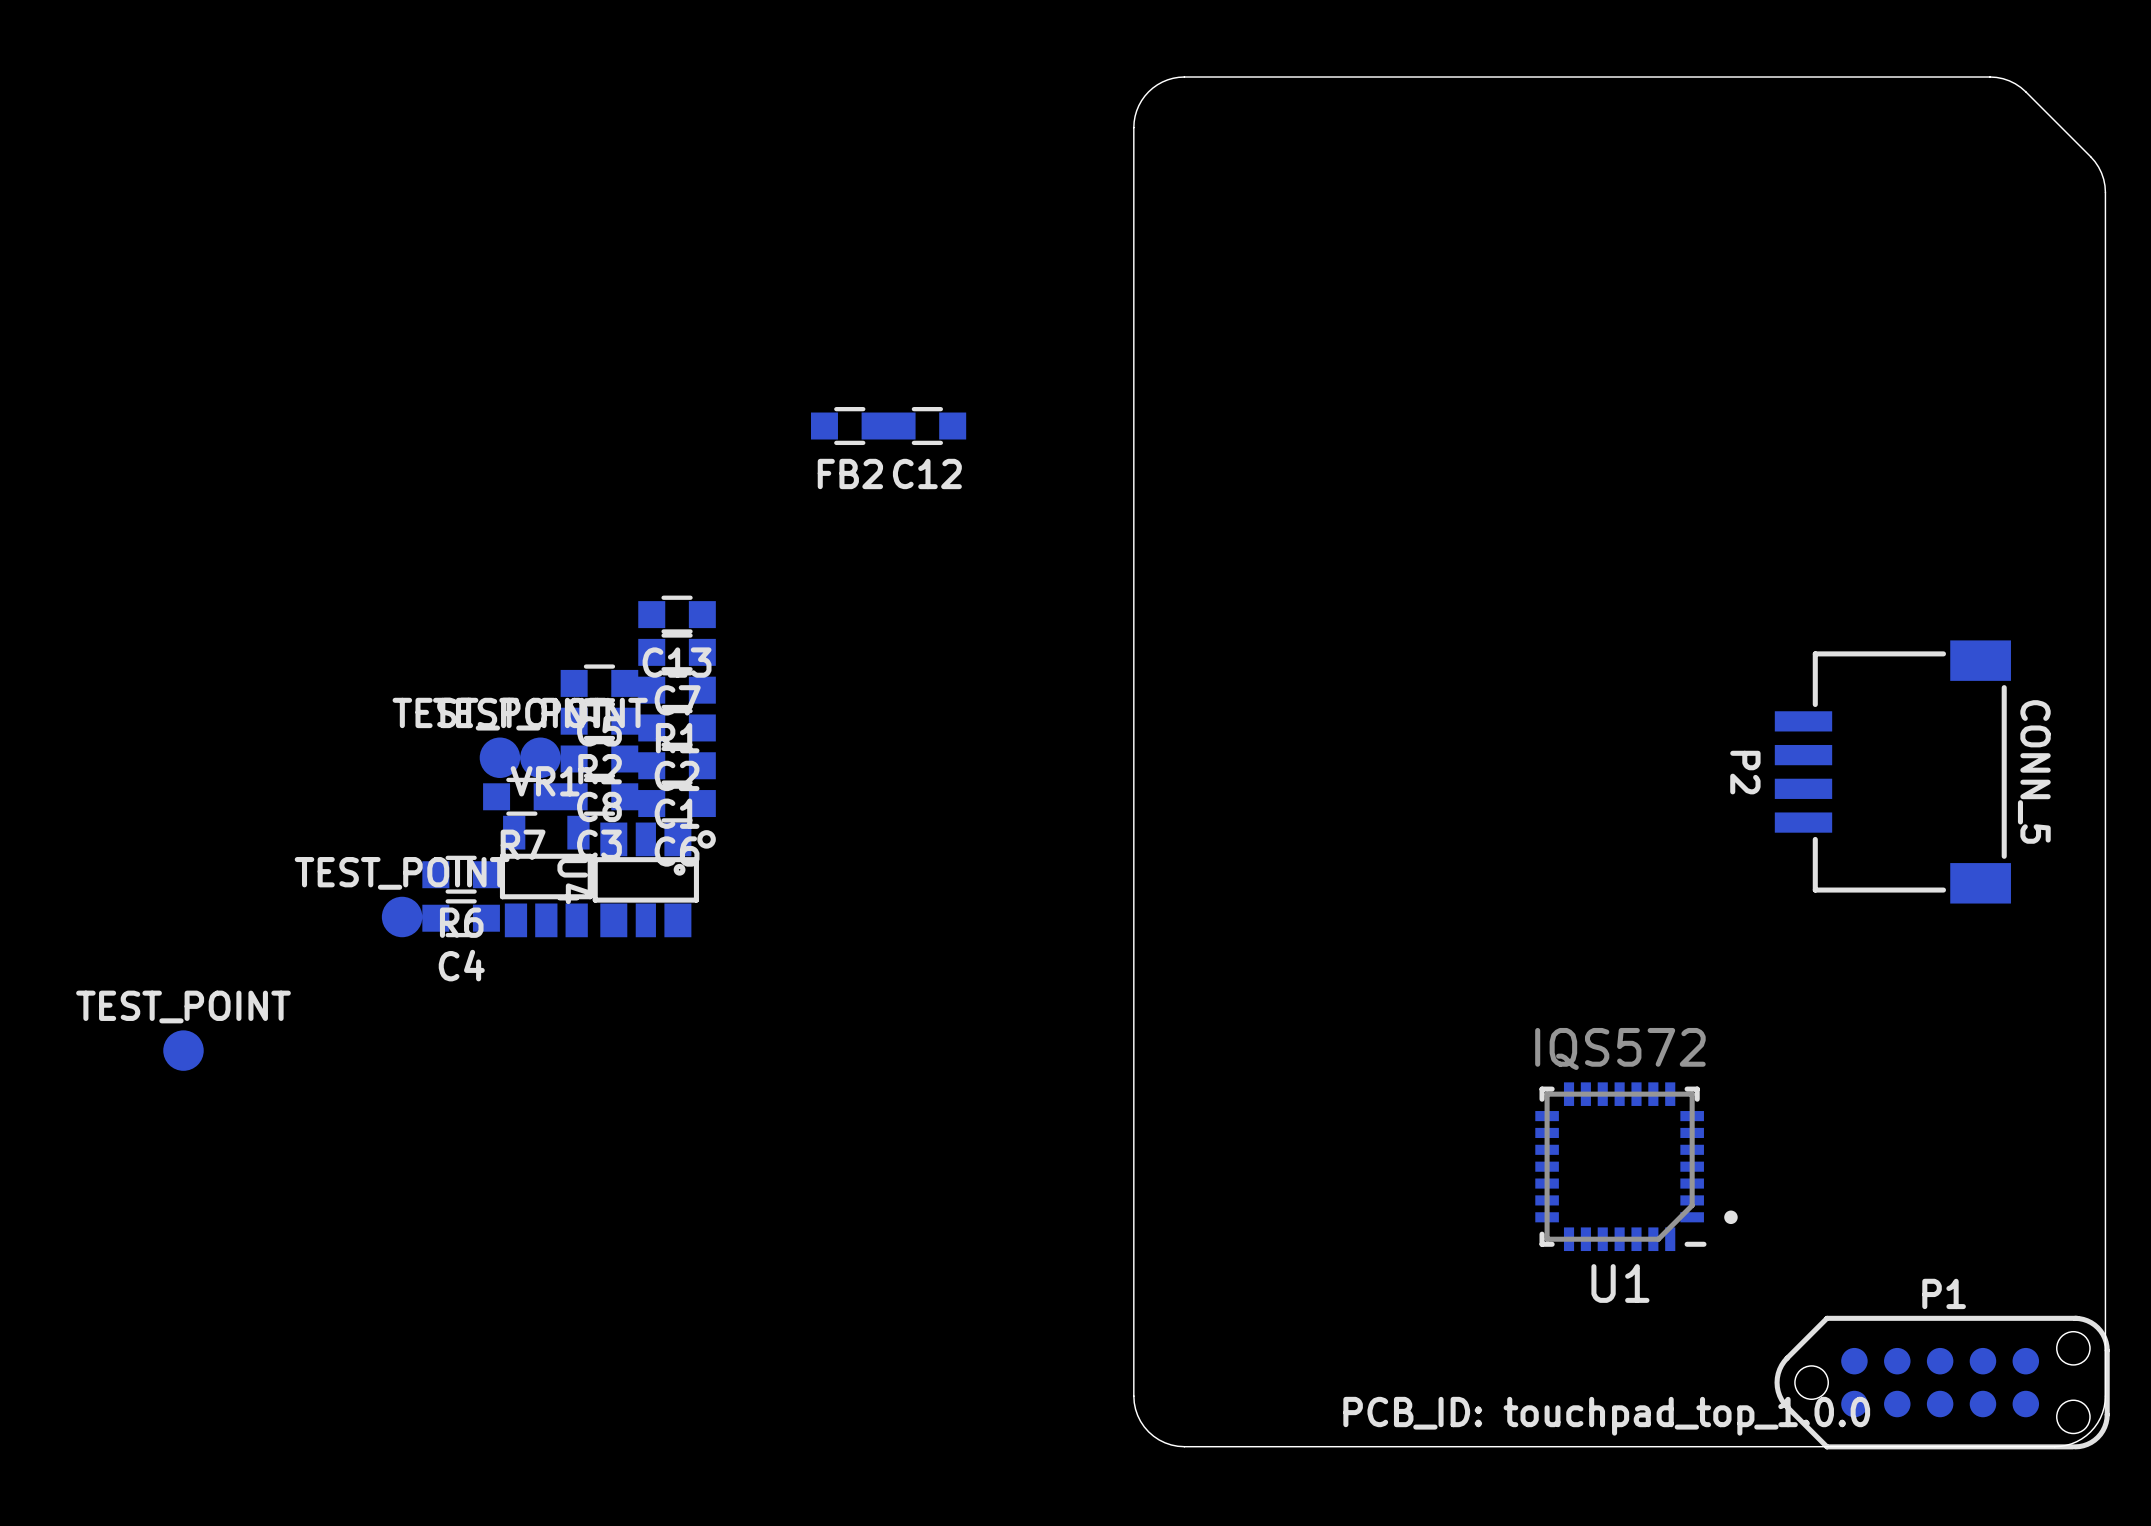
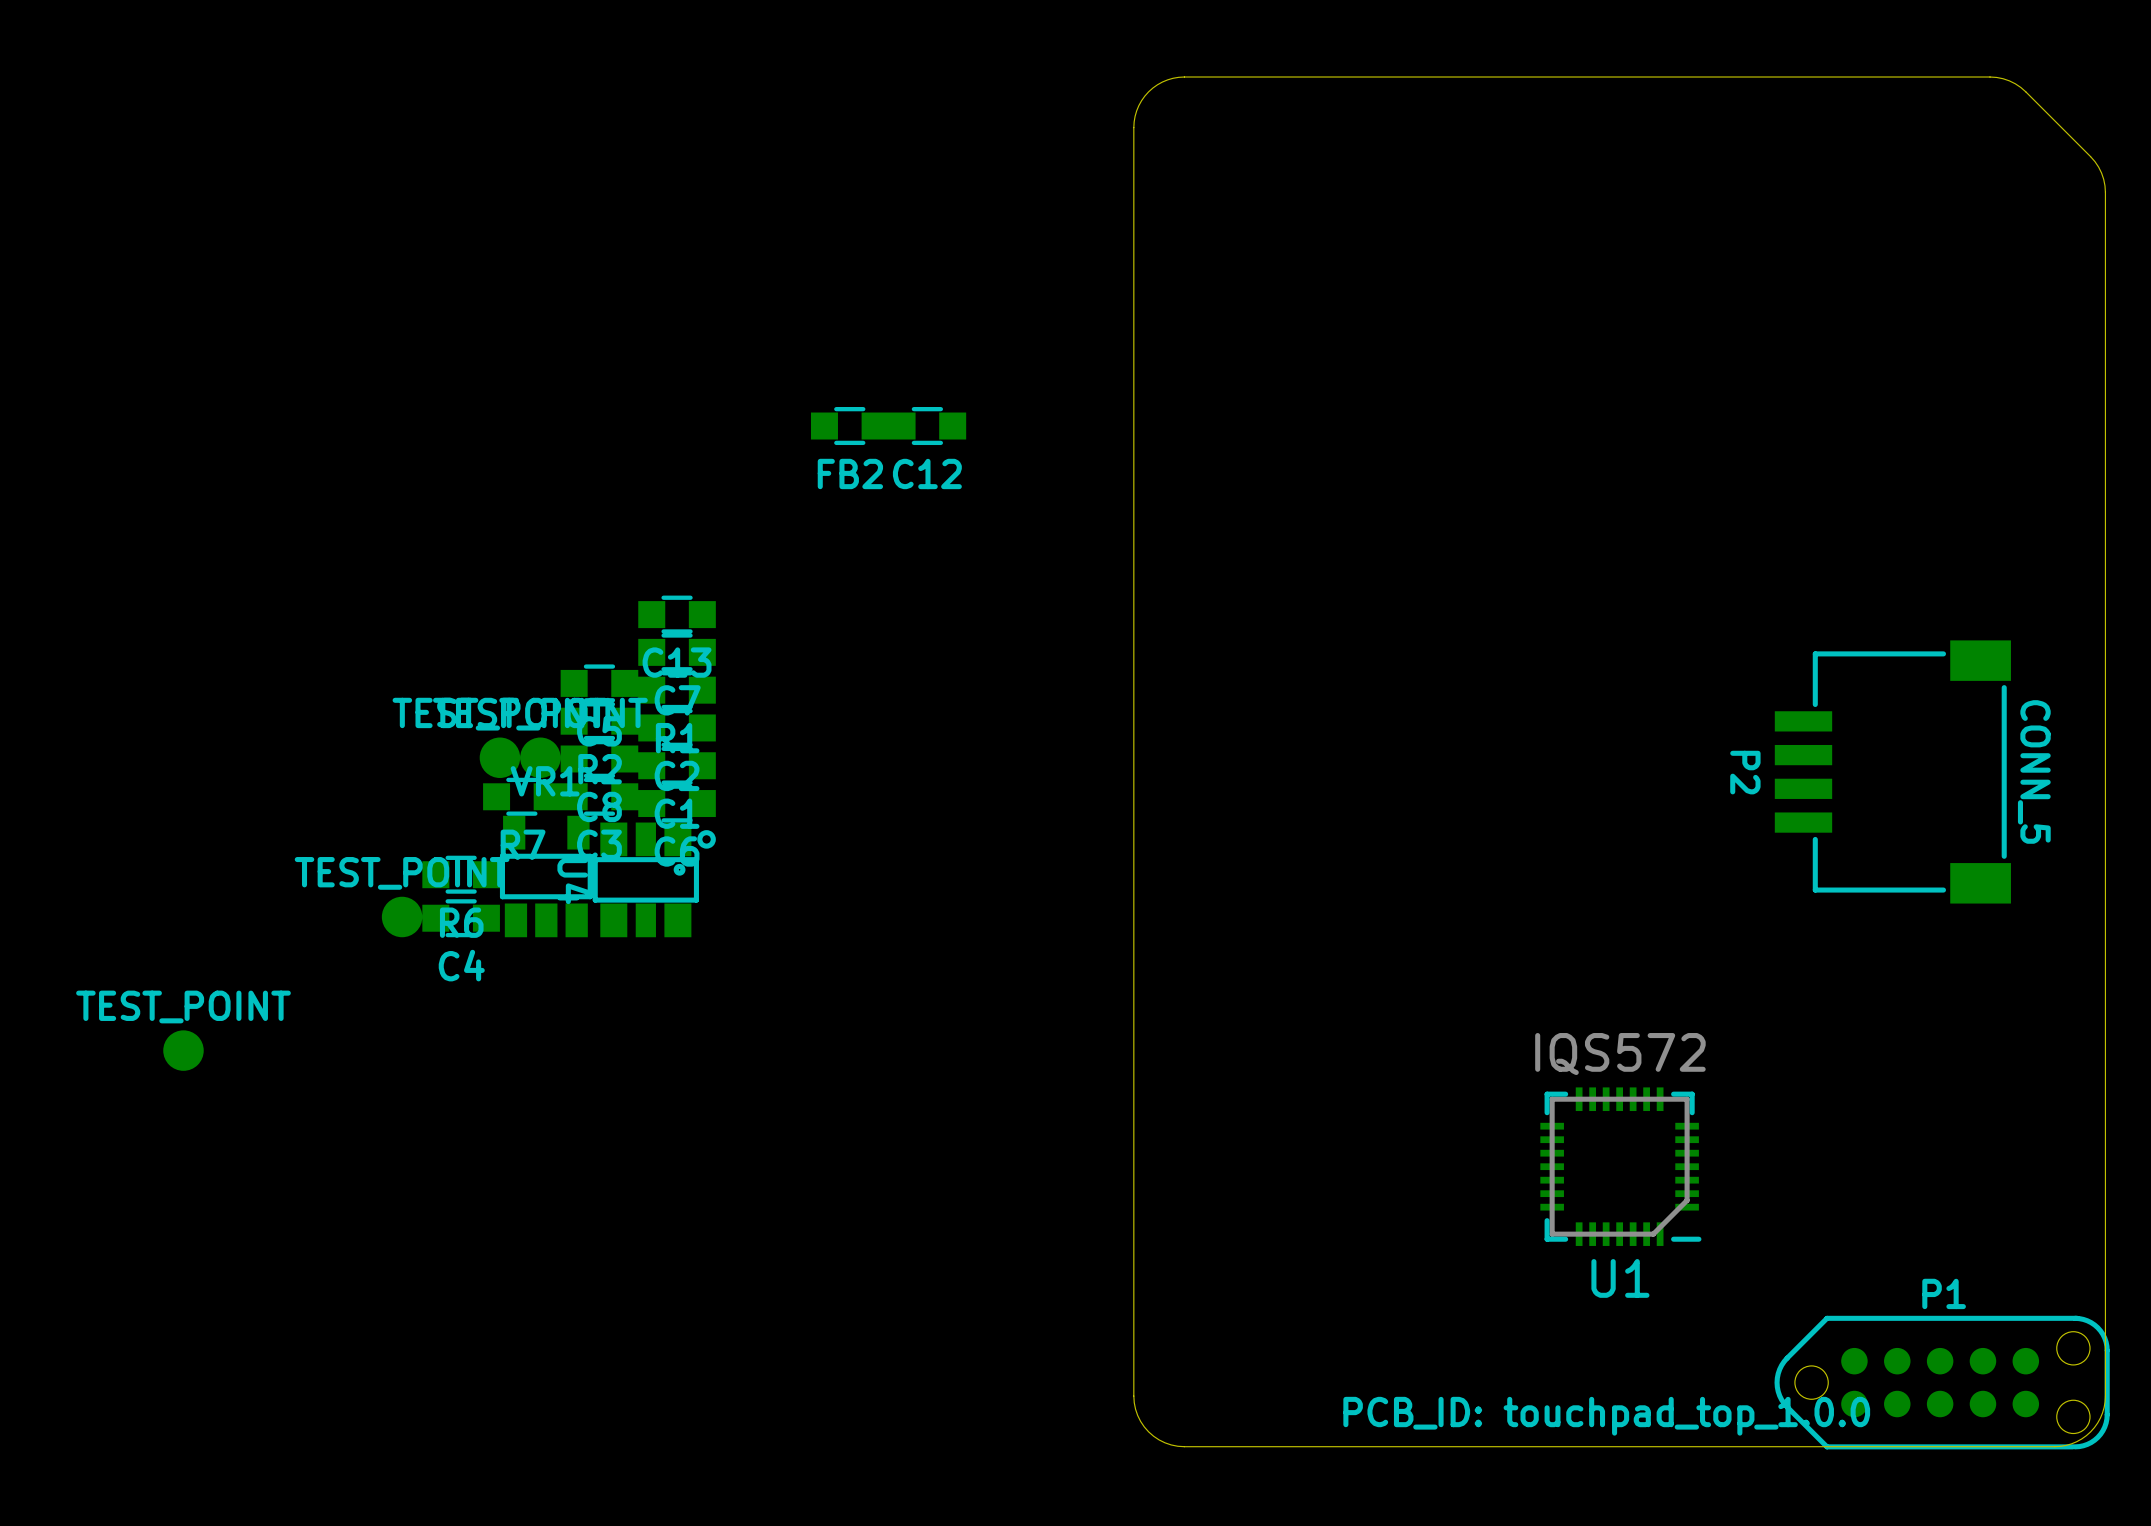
U1 footprint: [1535, 1082, 1738, 1252] -> [1540, 1087, 1702, 1246]

